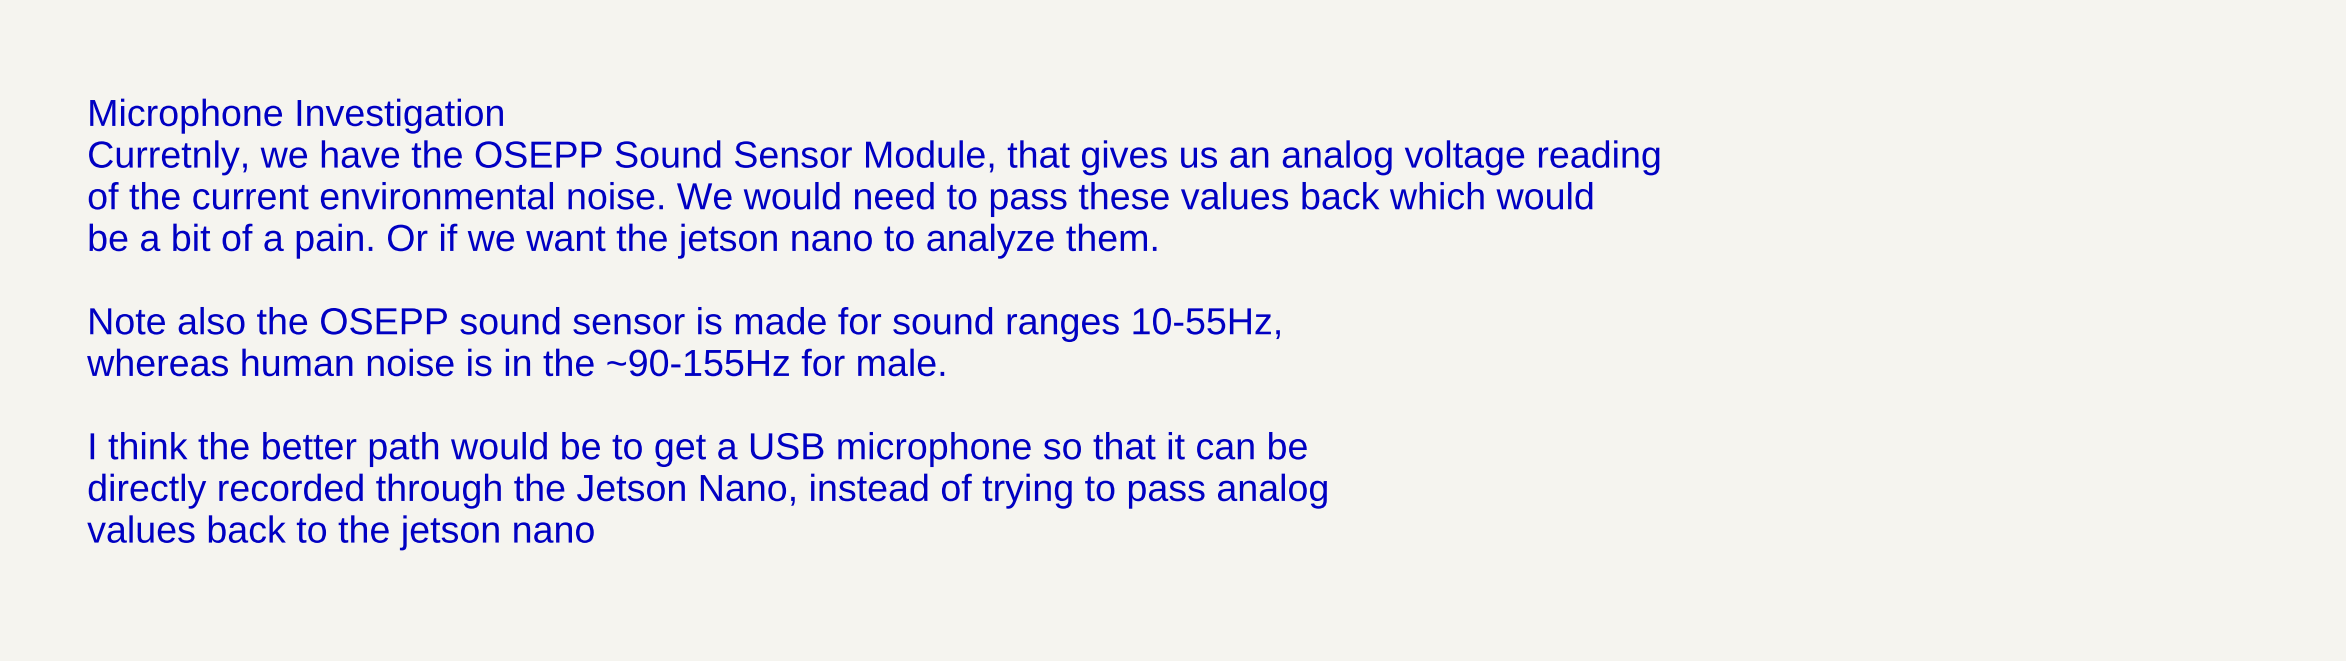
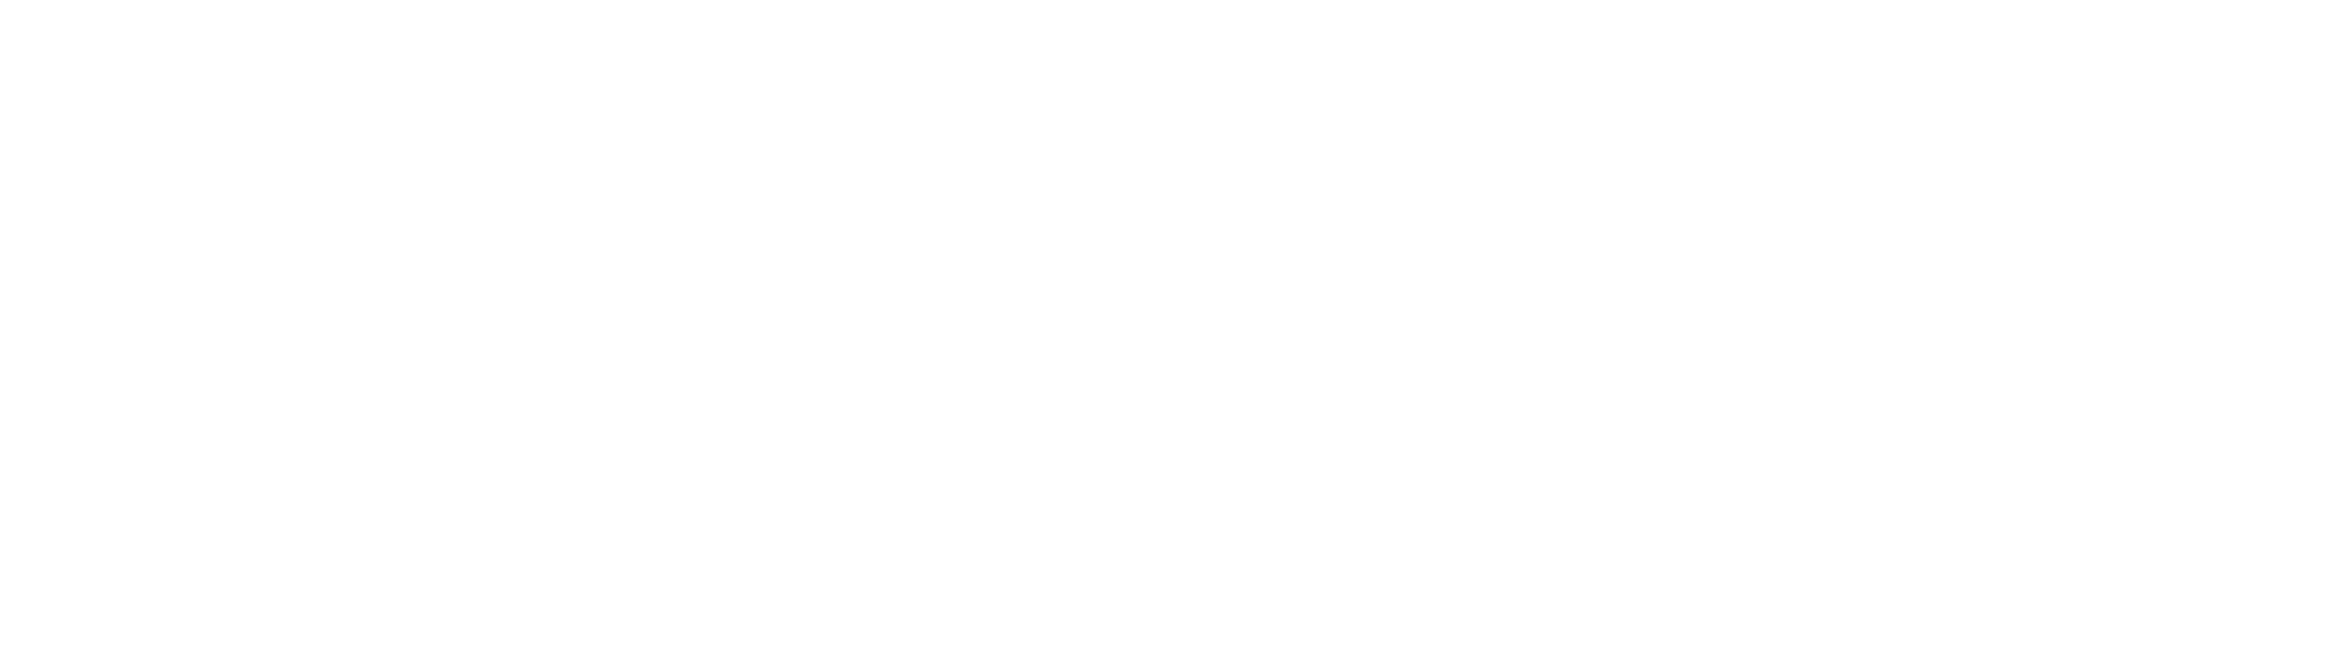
text: Microphone Investigation (296, 116) -> none
text: Curretnly, we have the OSEPP Sound Sensor Module, that gives us an analog voltage reading (874, 157) -> none
text: of the current environmental noise. We would need to pass these values back which would (840, 199) -> none
text: be a bit of a pain. Or if we want the jetson nano to analyze them. (623, 241) -> none
text: Note also the OSEPP sound sensor is made for sound ranges 10-55Hz, (685, 324) -> none
text: whereas human noise is in the ~90-155Hz for male. (515, 362) -> none
text: I think the better path would be to get a USB microphone so that it can be (698, 449) -> none
text: directly recorded through the Jetson Nano, instead of trying to pass analog (707, 491) -> none
text: values back to the jetson nano (340, 532) -> none

